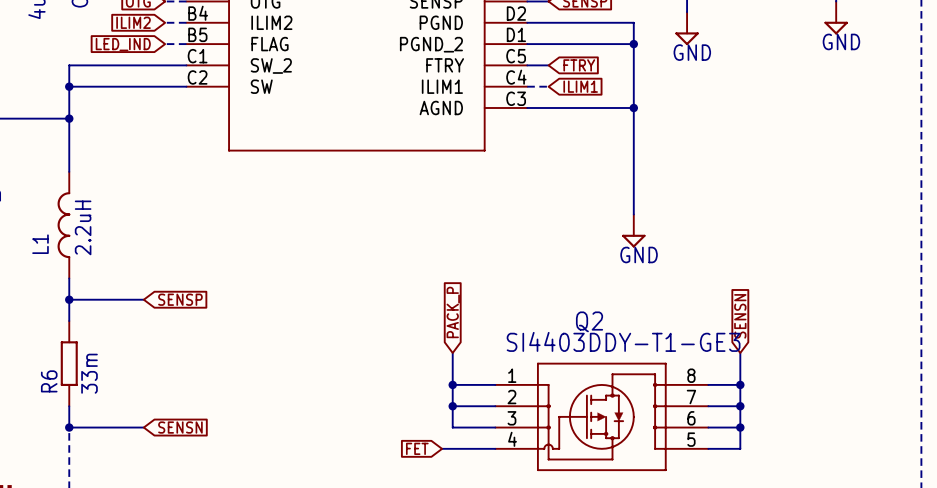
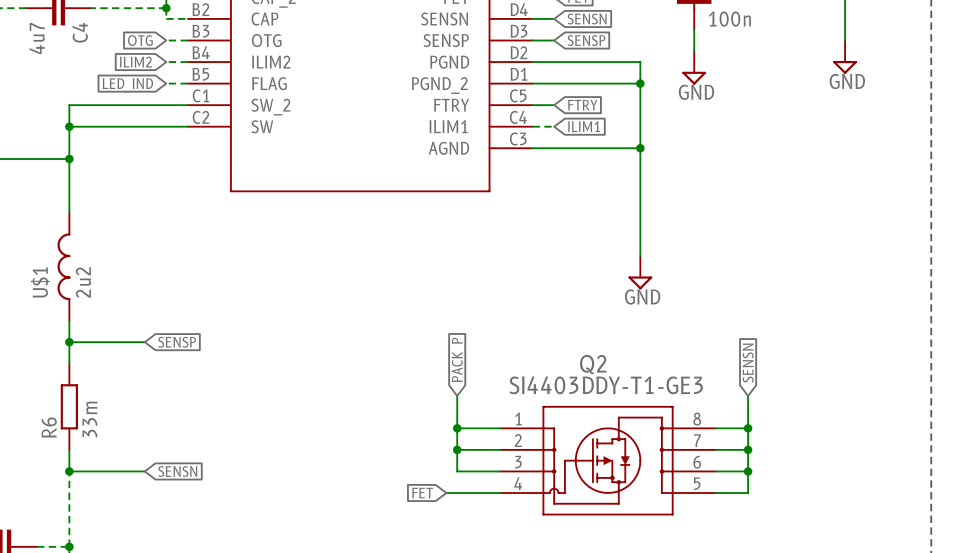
L1 value: 2.2uH (83, 227) -> 2u2 (83, 282)
L1 name: L1 (40, 244) -> U$1 (40, 282)

